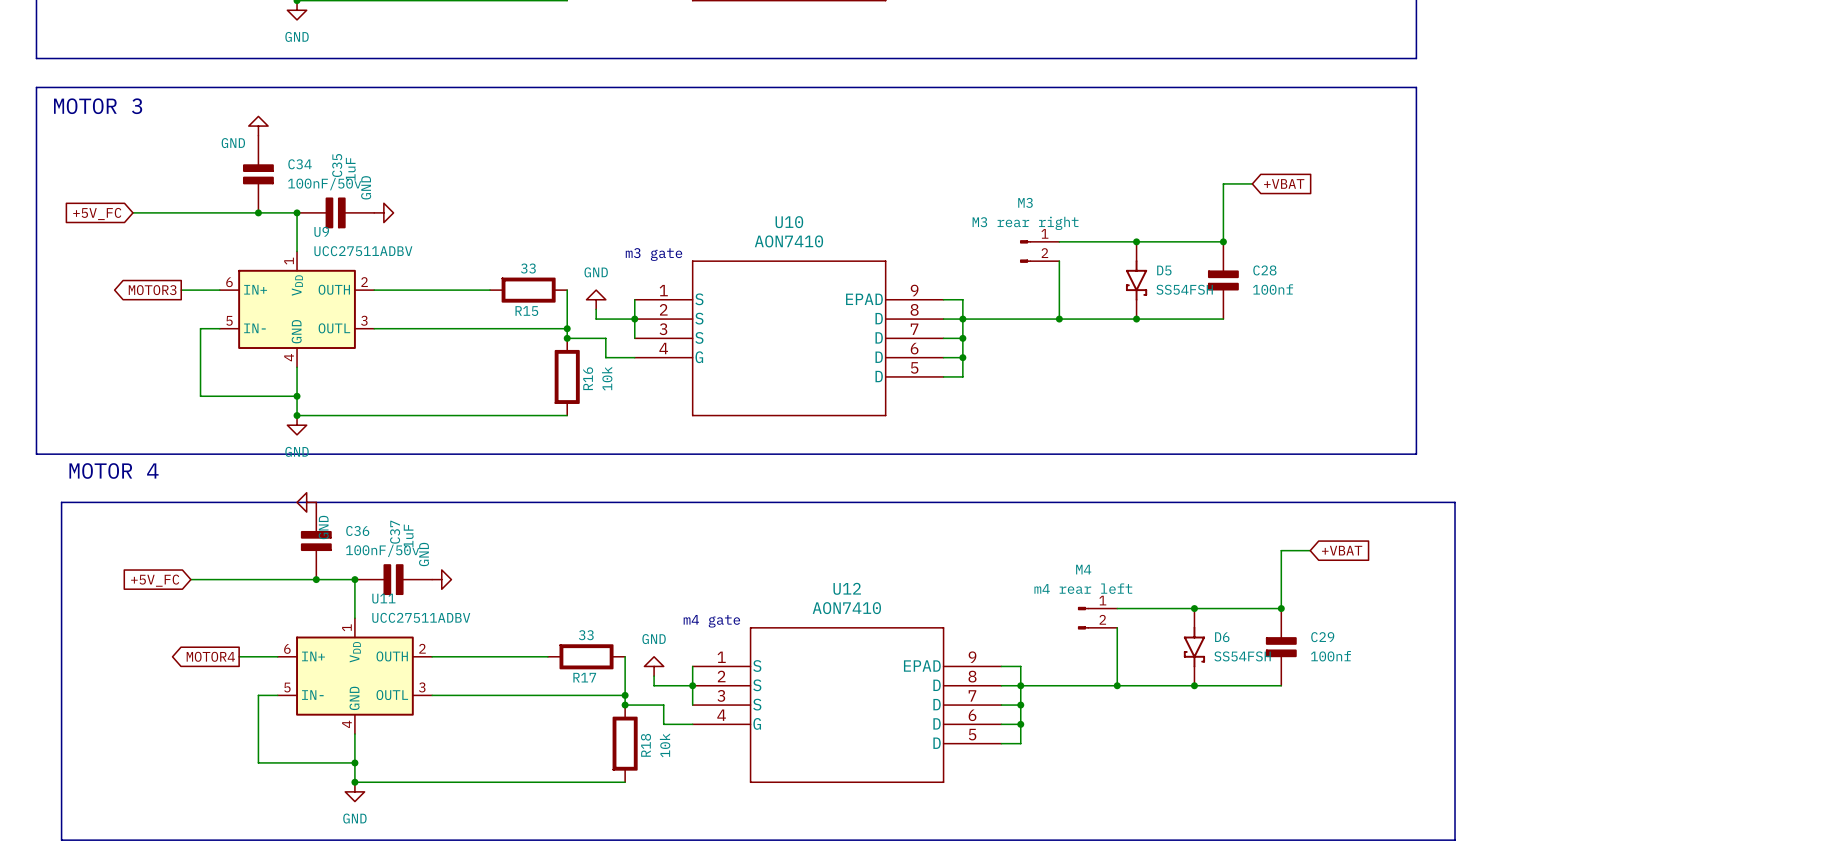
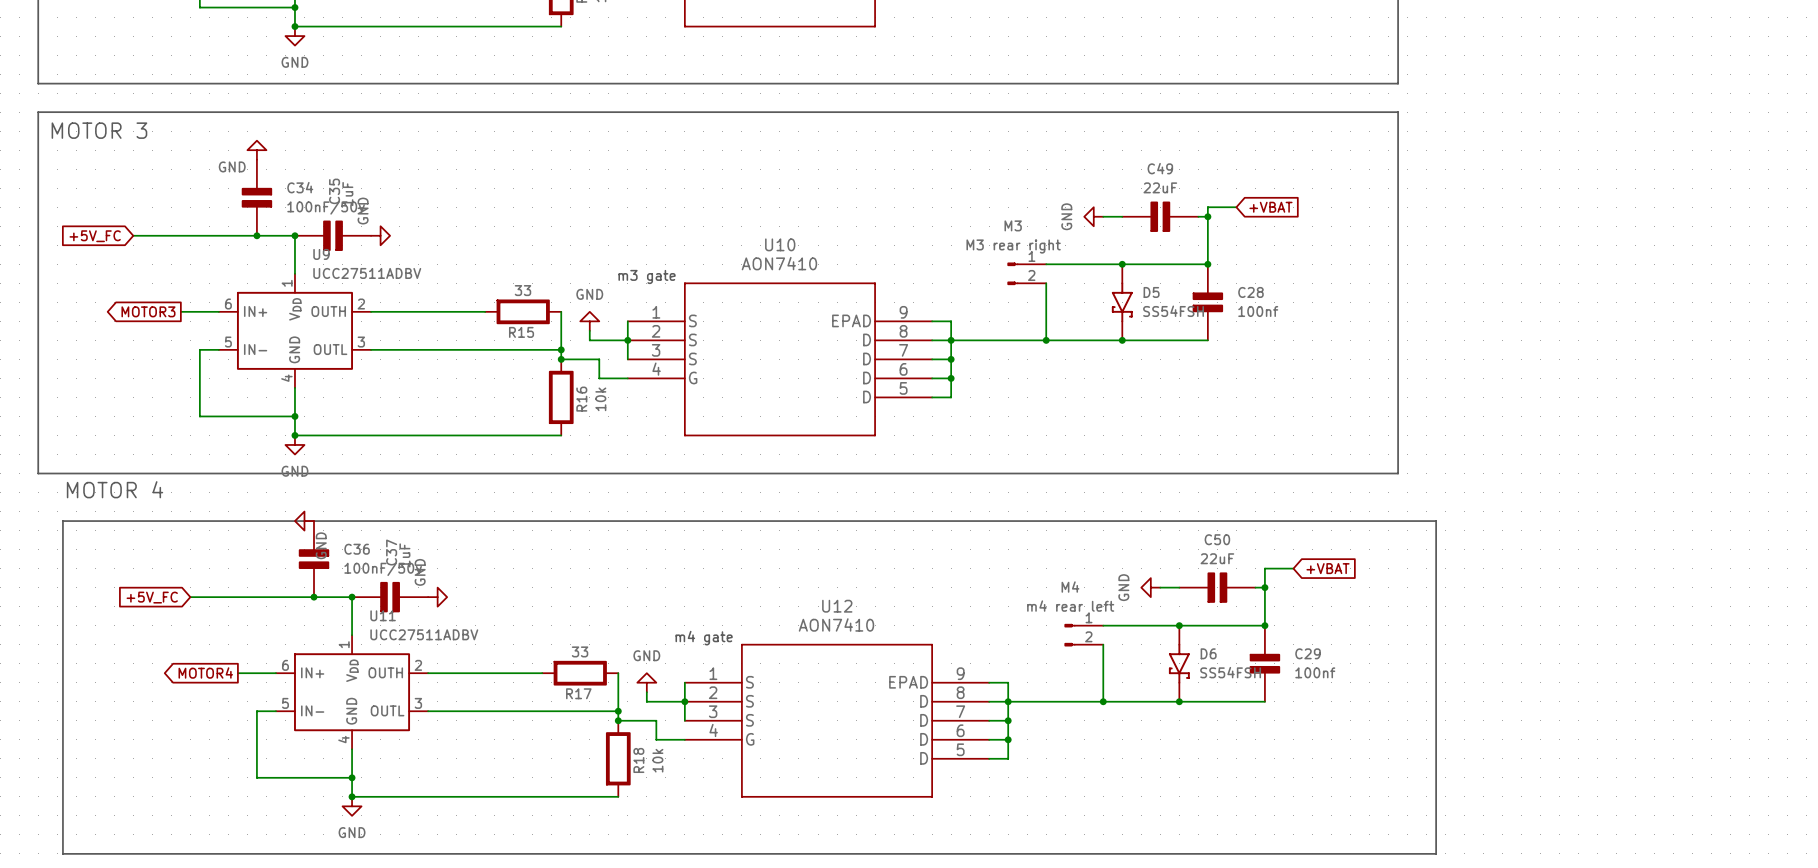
power symbol: none -> GND (1093, 216)
wire: none -> (1103, 216) (1122, 216)
C49: none -> 22uF (1160, 216)
wire: none -> (1198, 216) (1207, 216)
junction: none -> (1207, 216)
power symbol: none -> GND (1150, 587)
wire: none -> (1160, 587) (1179, 587)
C50: none -> 22uF (1217, 587)
wire: none -> (1255, 587) (1264, 587)
junction: none -> (1264, 587)

